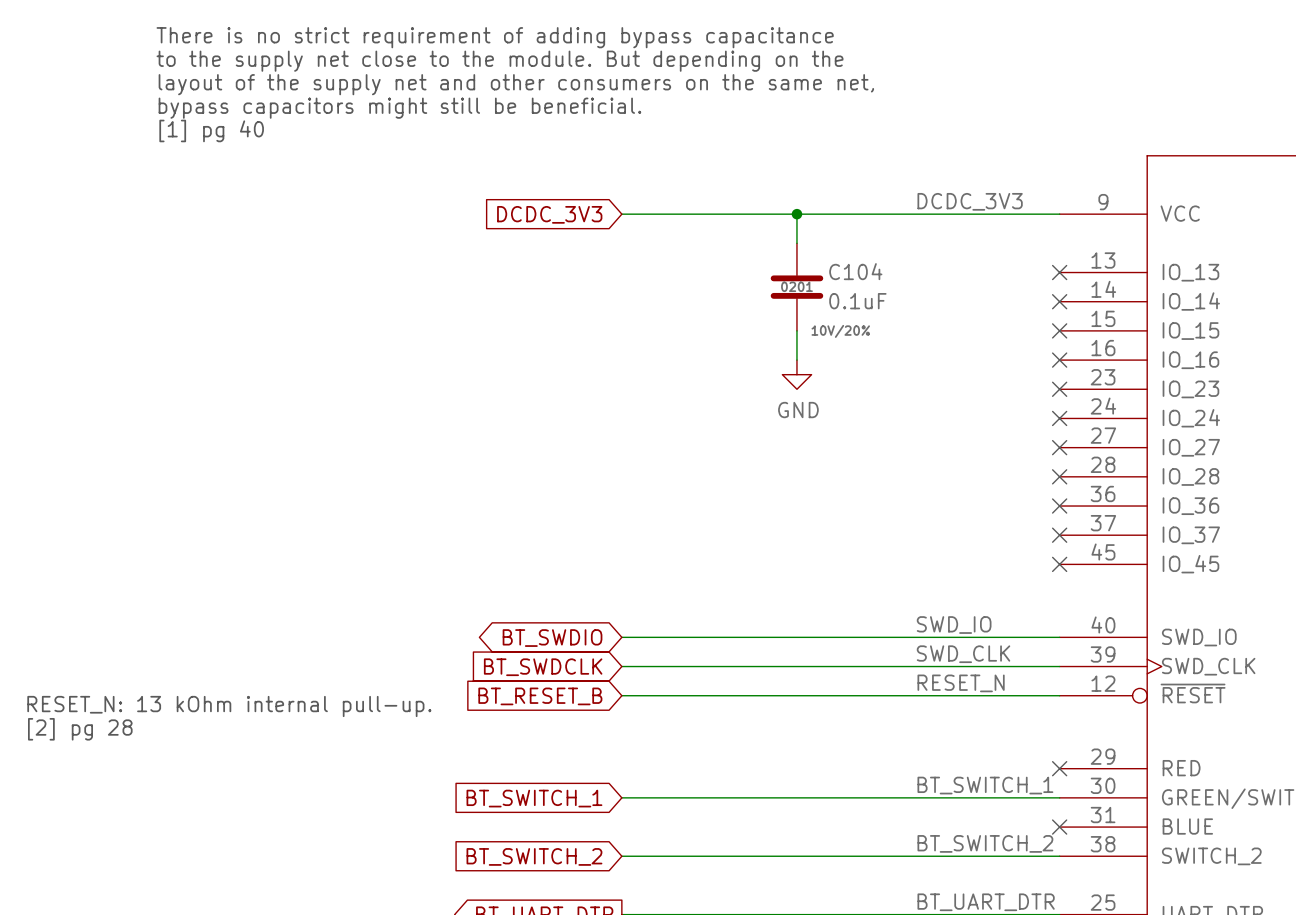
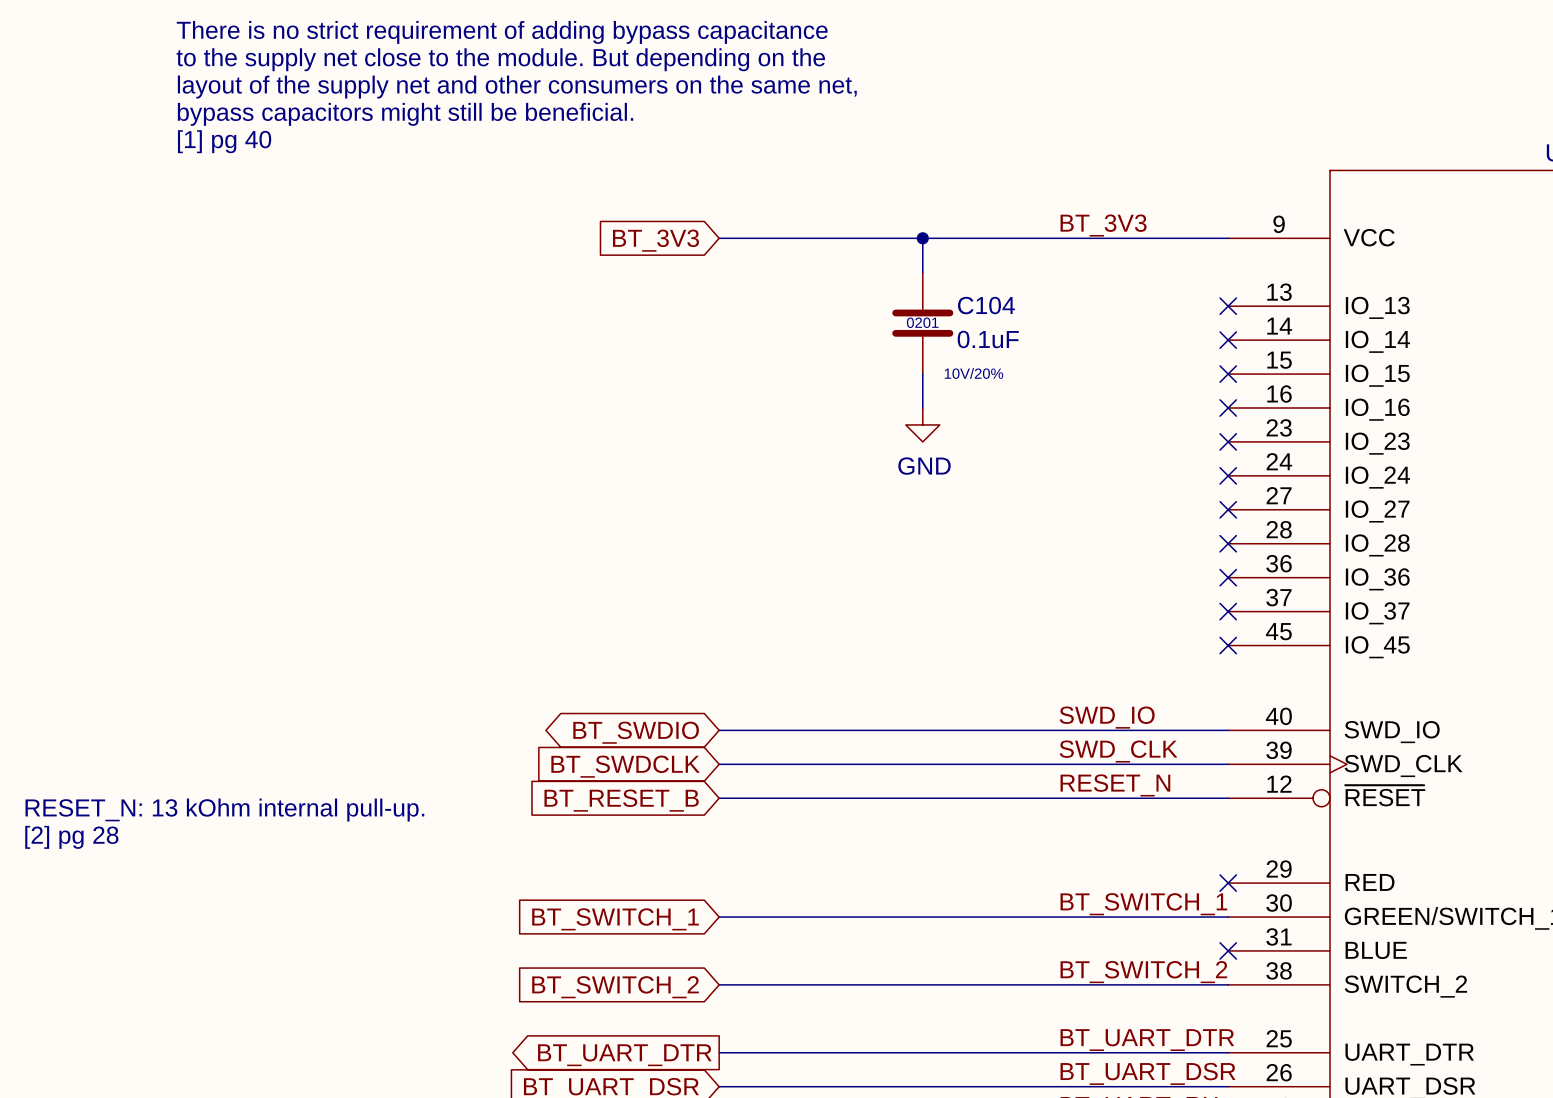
label: DCDC_3V3 (970, 201) -> BT_3V3 (1103, 225)
global label: DCDC_3V3 (549, 214) -> BT_3V3 (655, 240)

